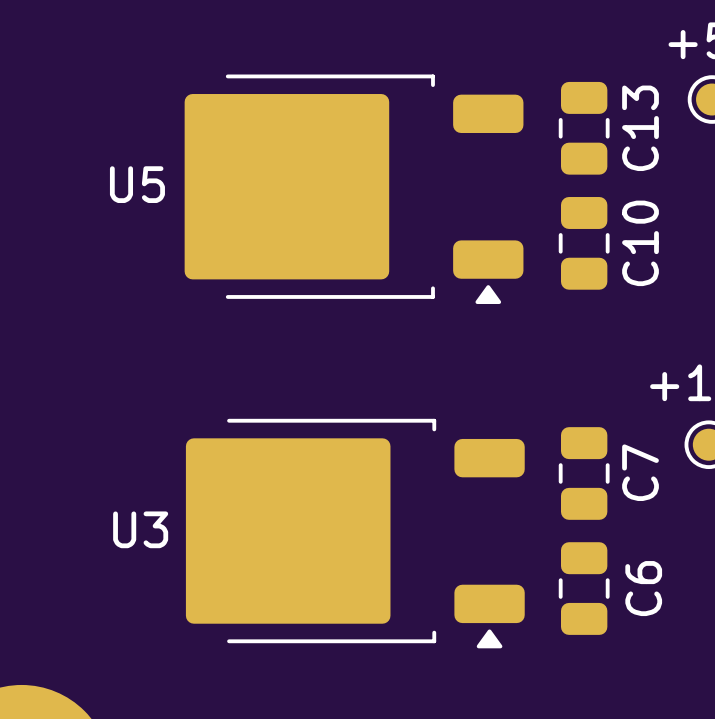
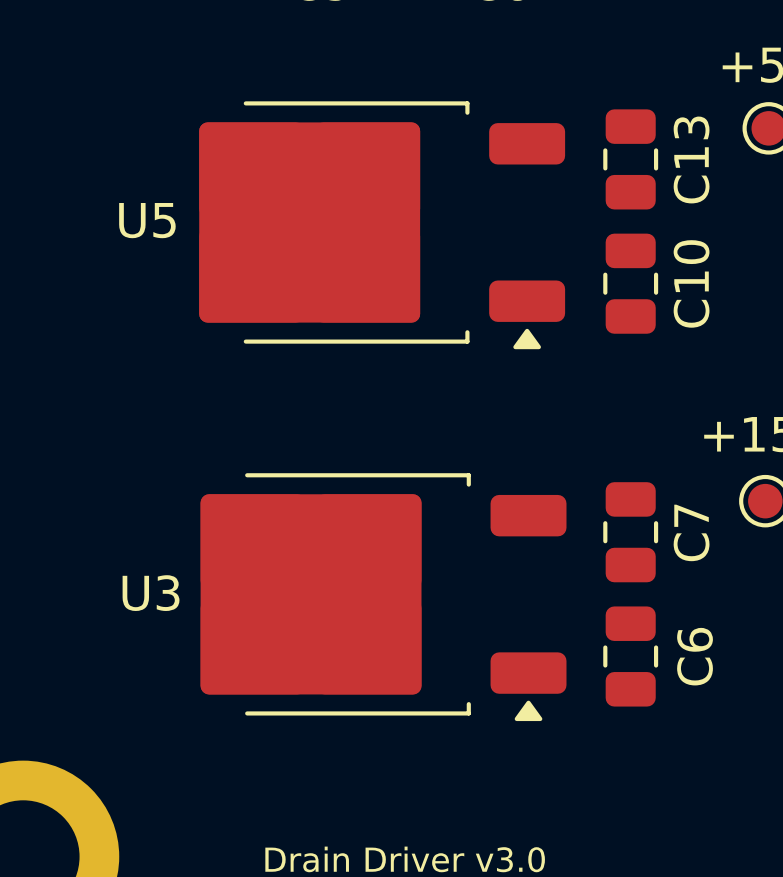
U5 footprint: [184, 74, 524, 305] -> [199, 101, 566, 350]
U3 footprint: [185, 418, 525, 649] -> [200, 473, 567, 722]

